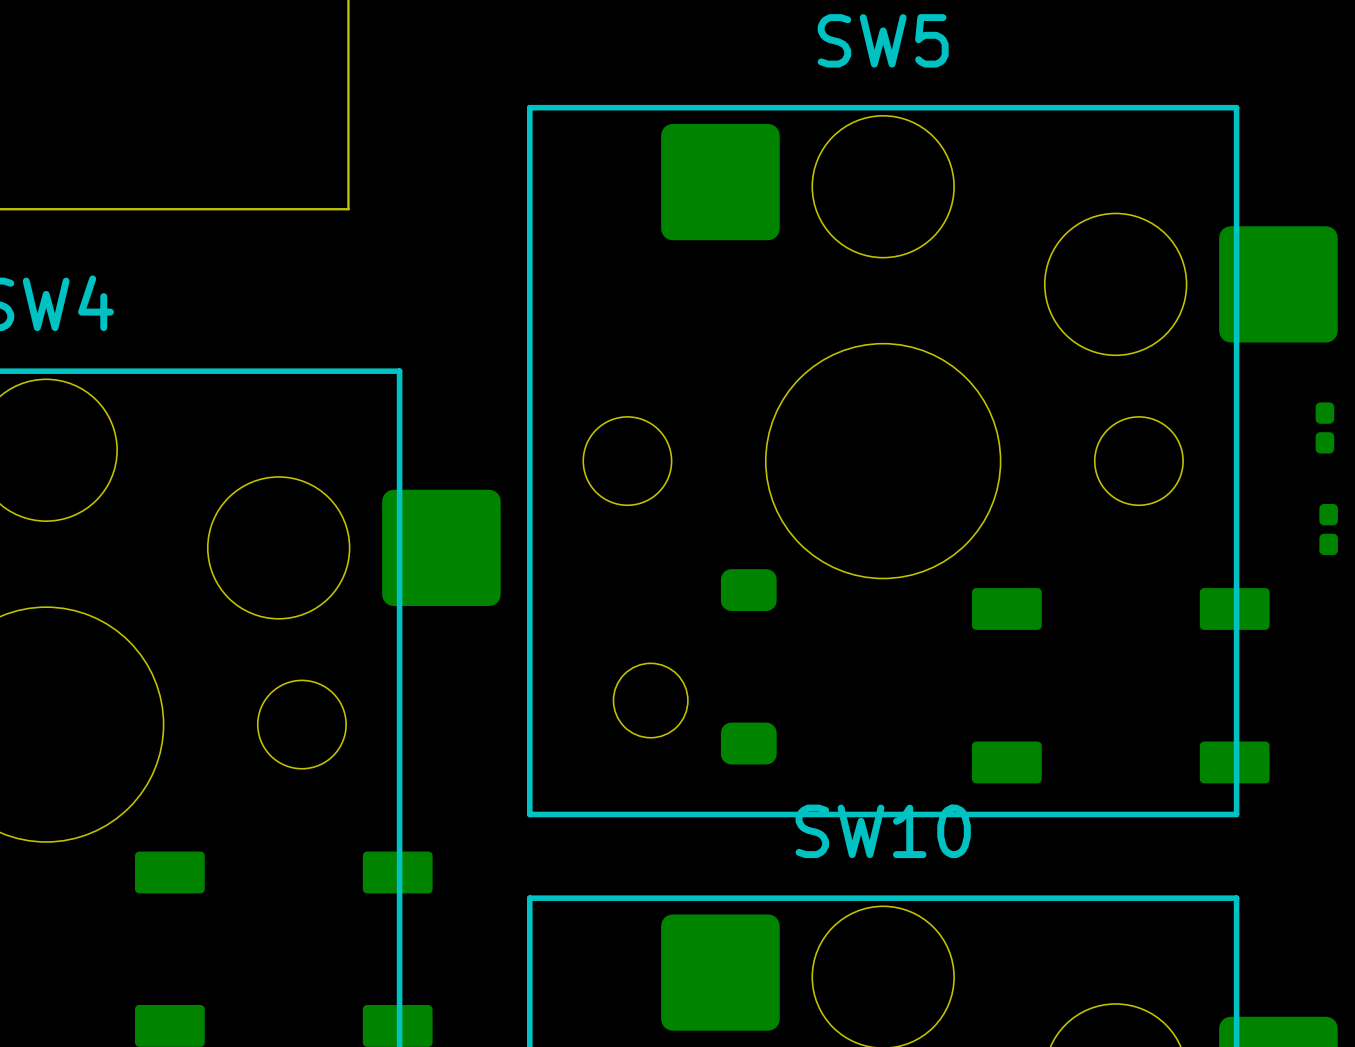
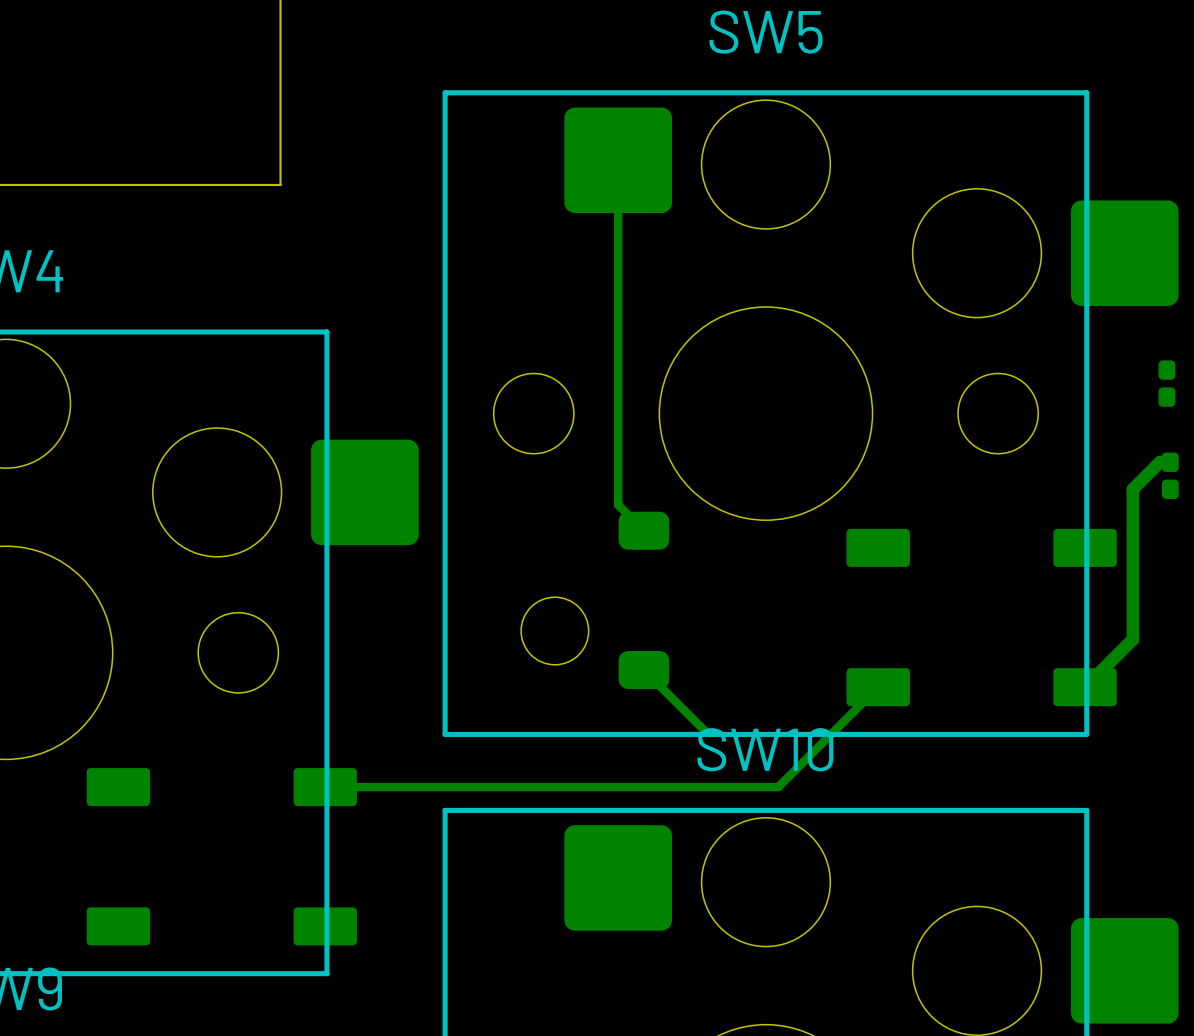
bottom track: none -> (618, 160) (618, 504) (643, 530)
bottom track: none -> (1170, 462) (1159, 462) (1132, 489) (1132, 639) (1085, 687)
bottom track: none -> (643, 670) (705, 731)
bottom track: none -> (878, 687) (778, 787) (325, 787)

